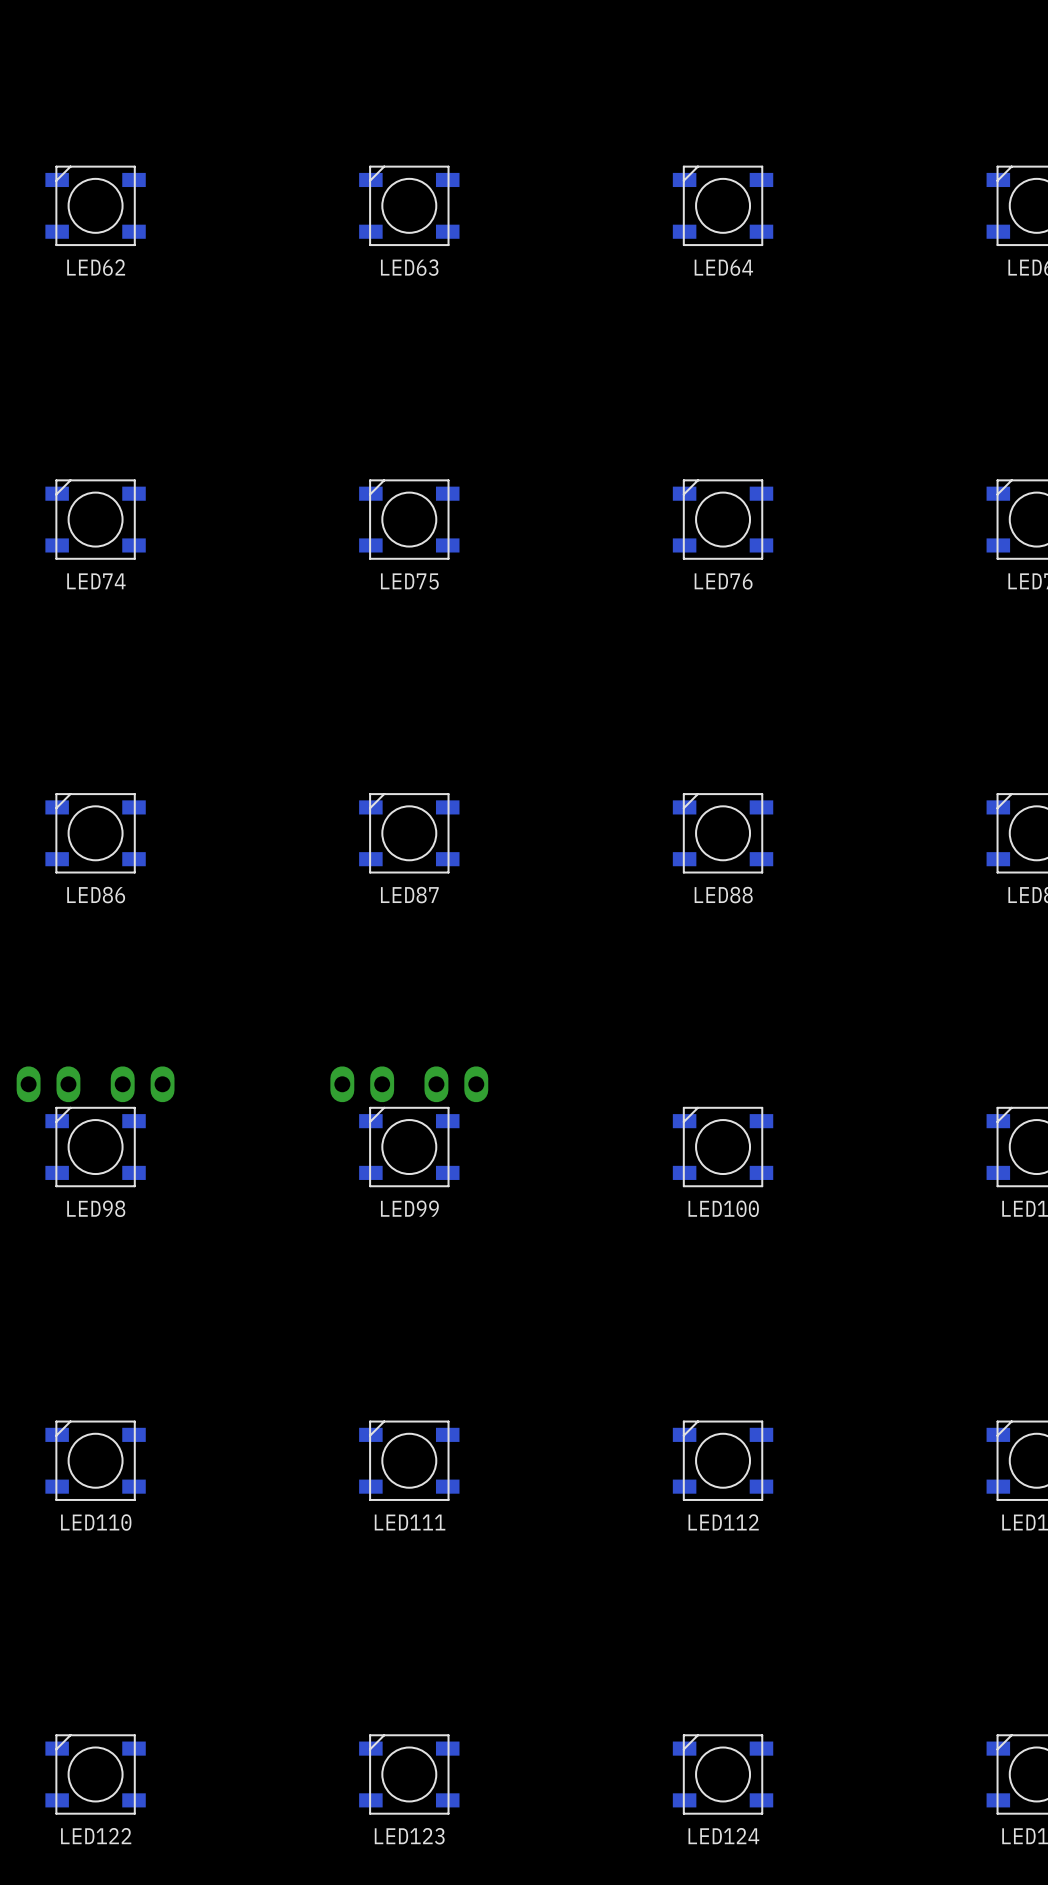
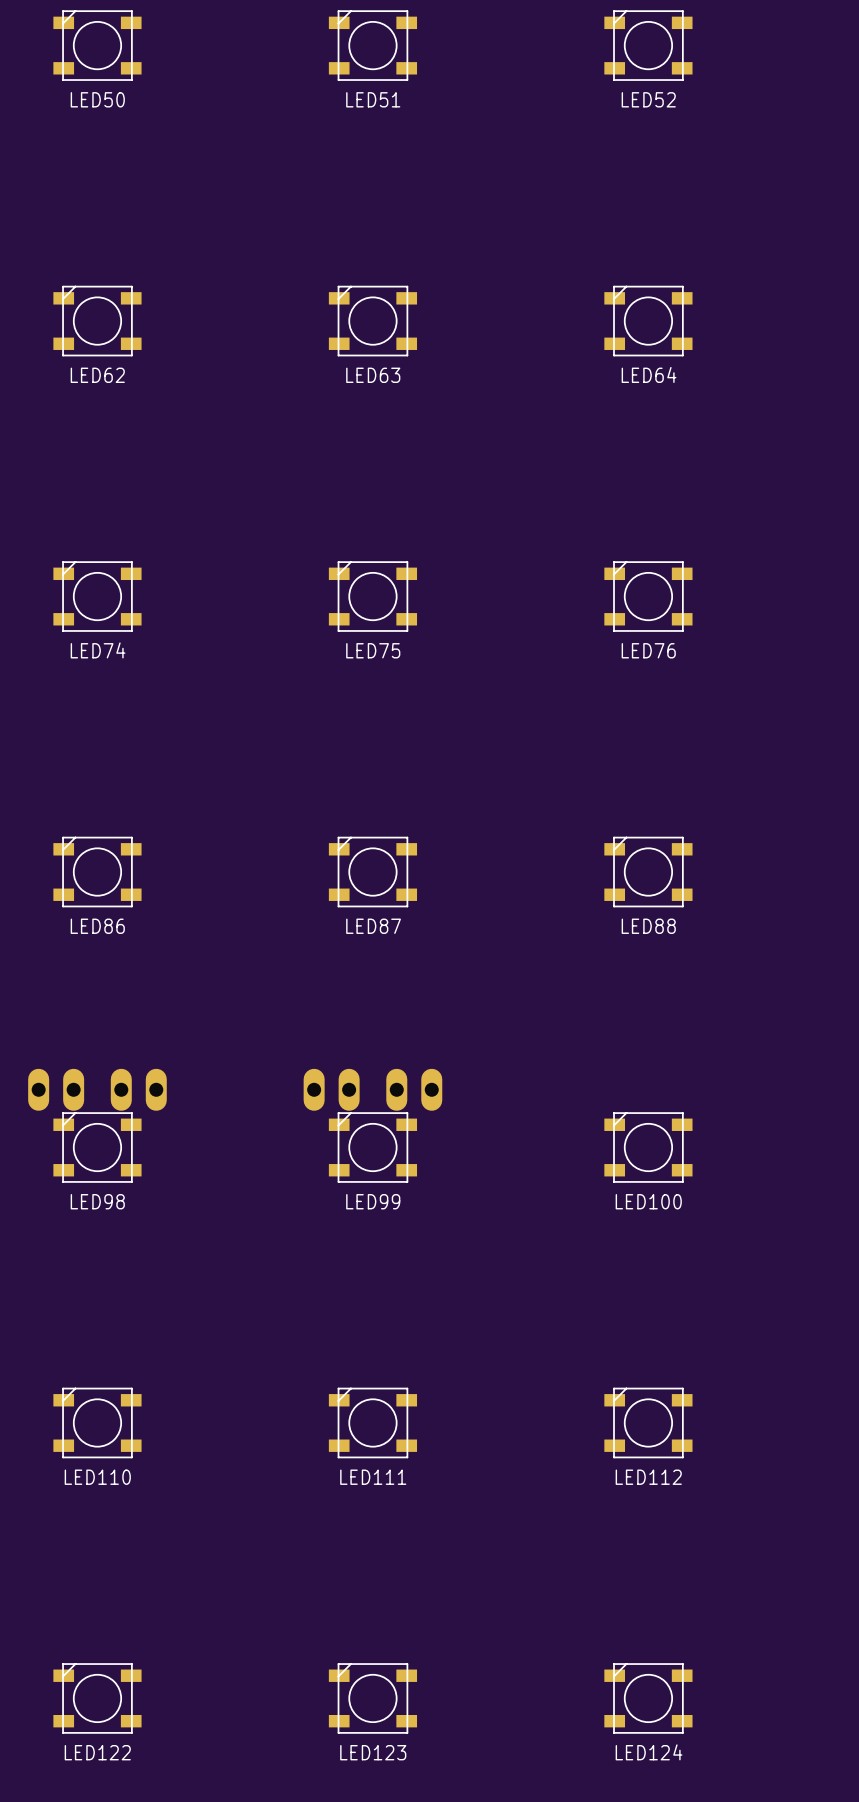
part footprint: [16, 1066, 81, 1103] -> [28, 1068, 85, 1111]
part footprint: [110, 1066, 175, 1103] -> [110, 1068, 167, 1111]
part footprint: [330, 1066, 395, 1103] -> [303, 1068, 360, 1111]
part footprint: [424, 1066, 489, 1103] -> [386, 1068, 443, 1111]

